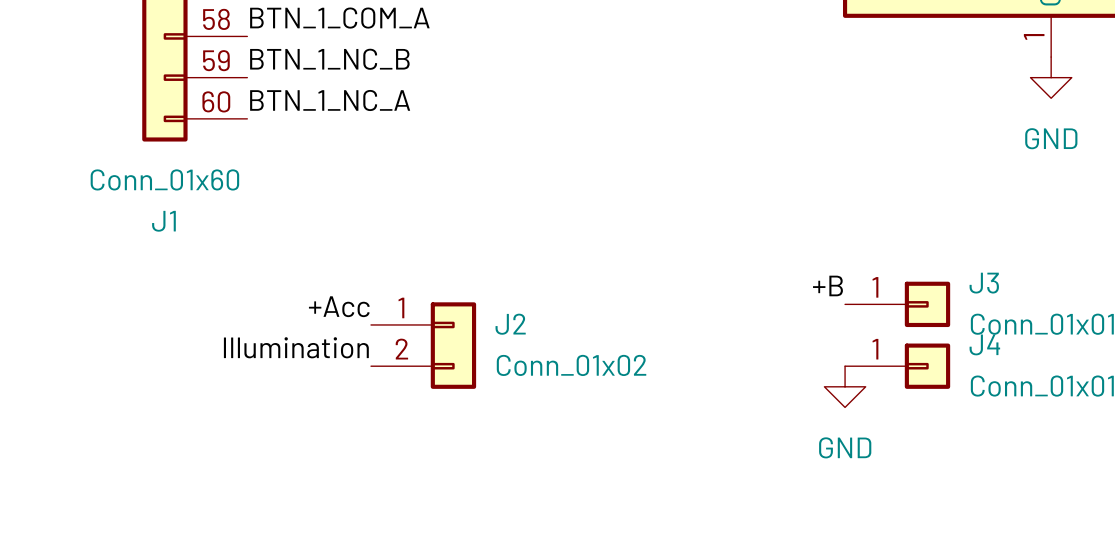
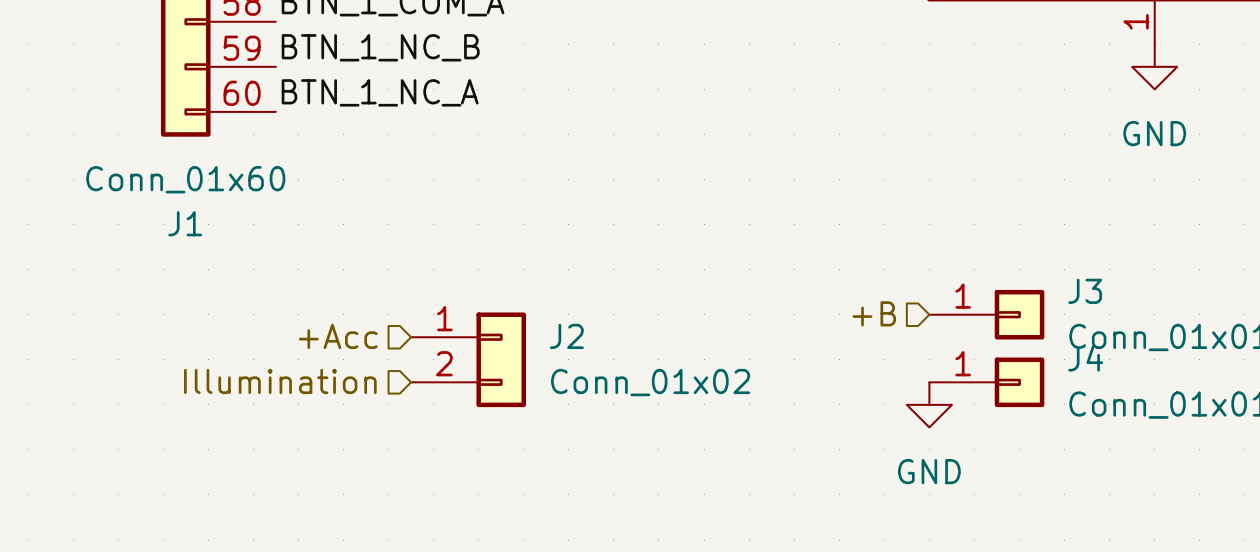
label: +B (827, 285) -> none
hierarchical label: none -> +B (874, 313)
label: +Acc (339, 306) -> none
hierarchical label: none -> +Acc (338, 336)
label: Illumination (296, 347) -> none
hierarchical label: none -> Illumination (280, 381)

